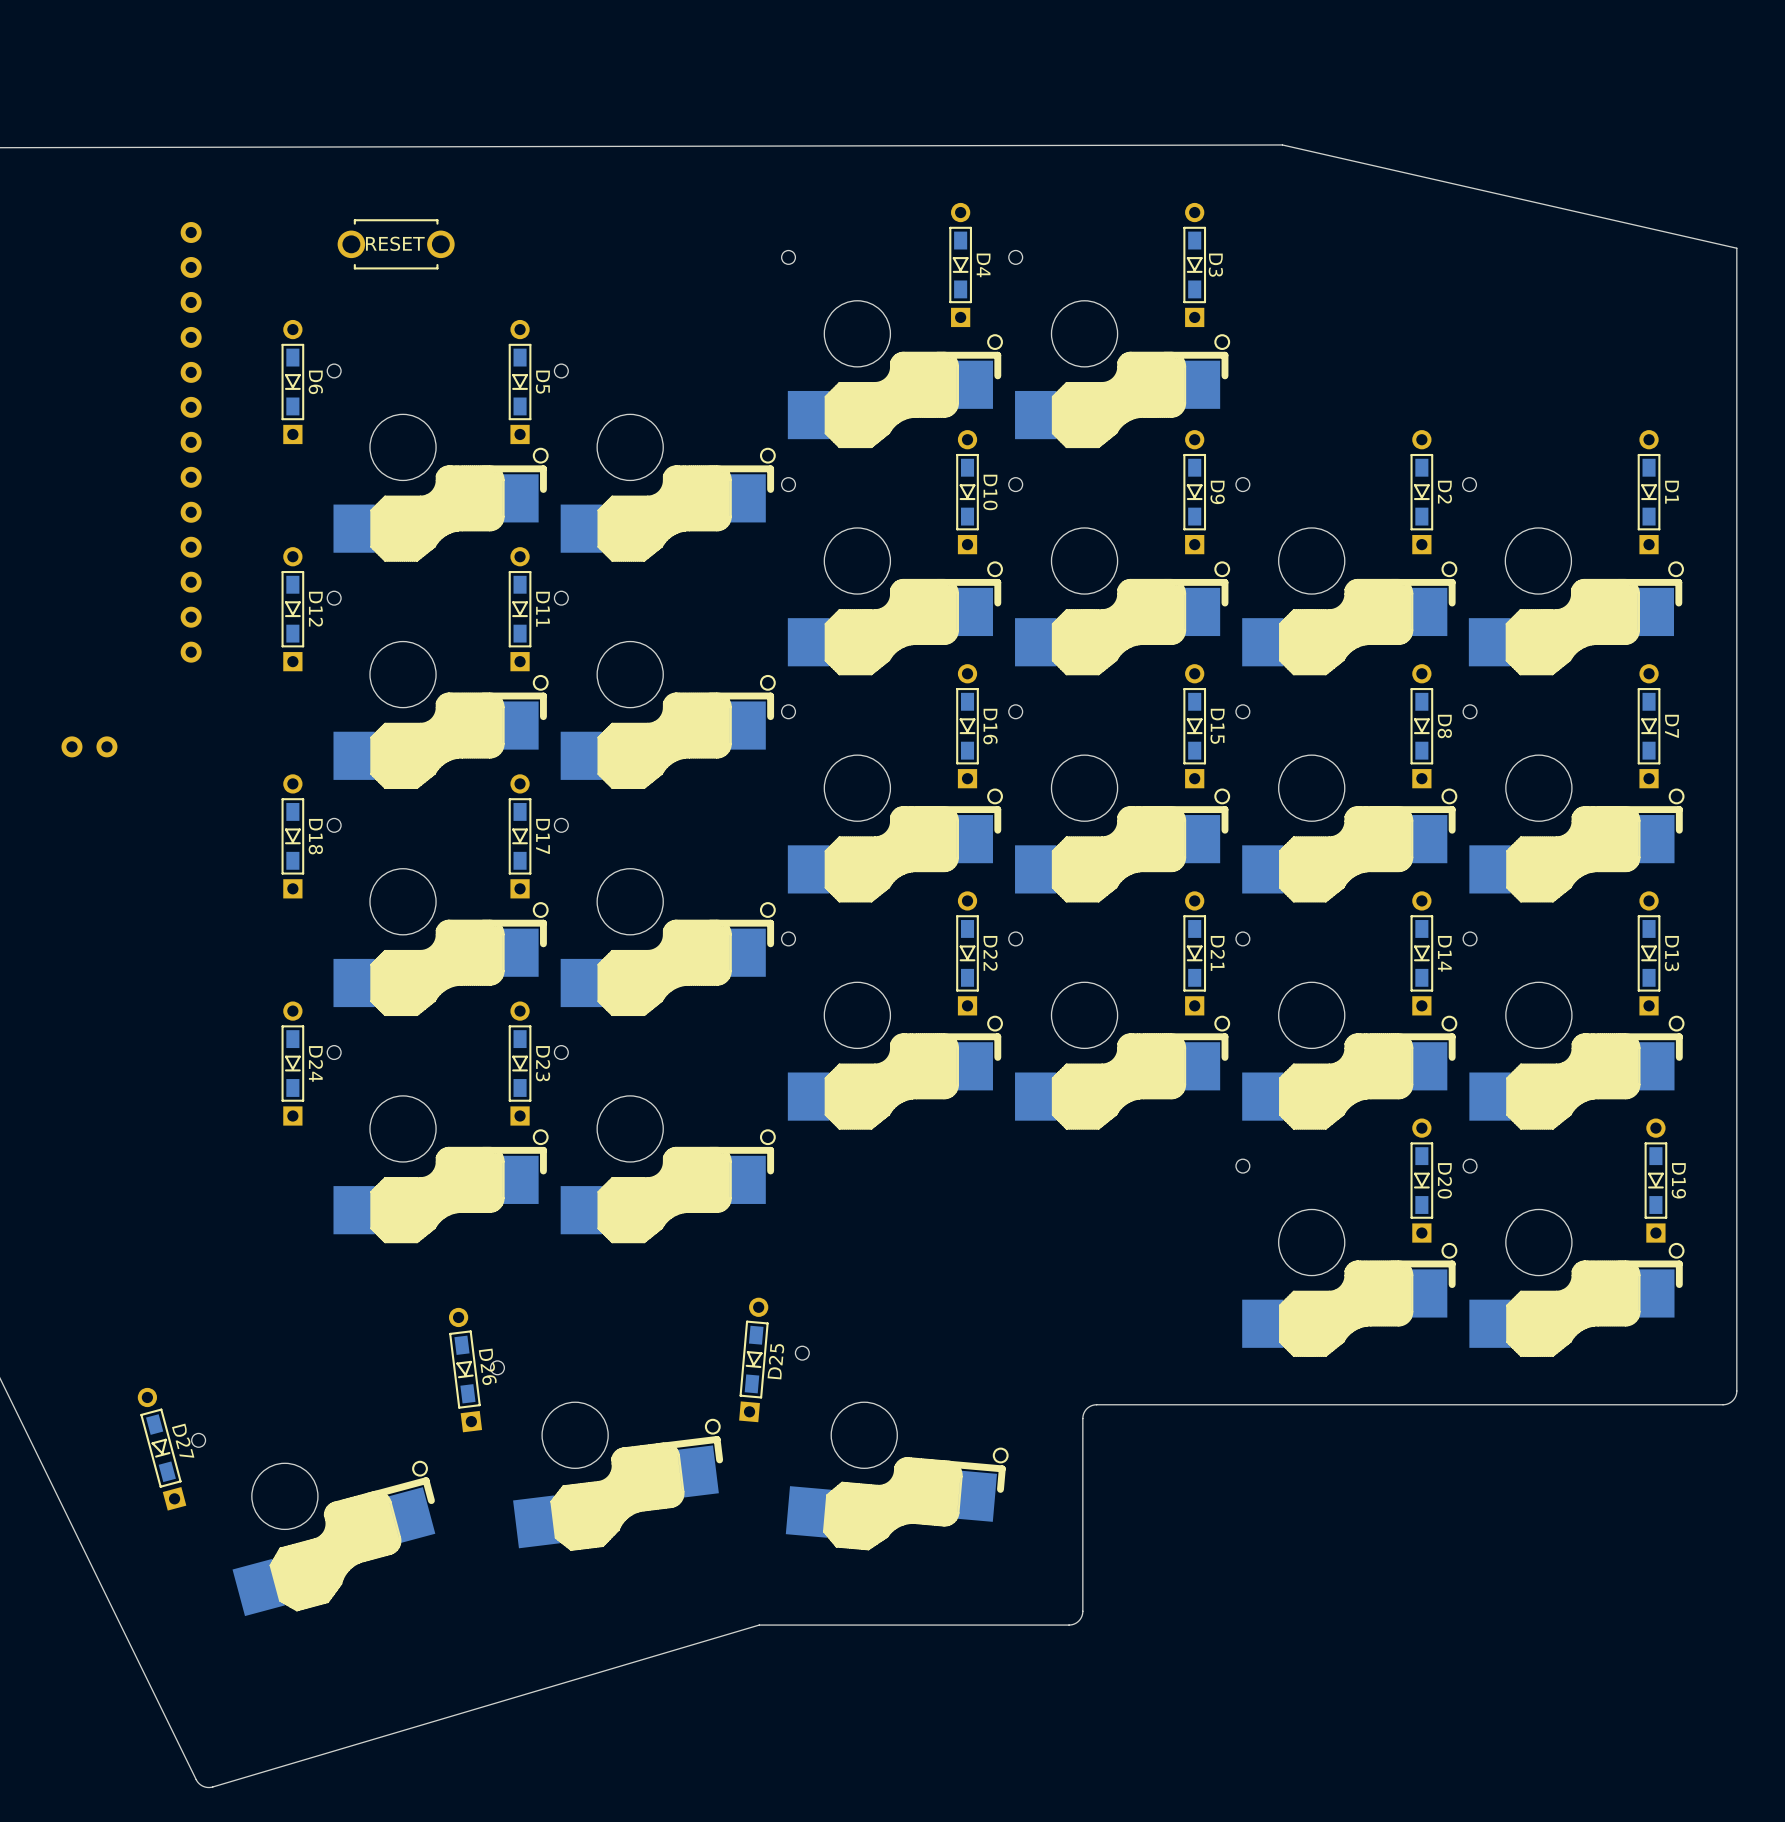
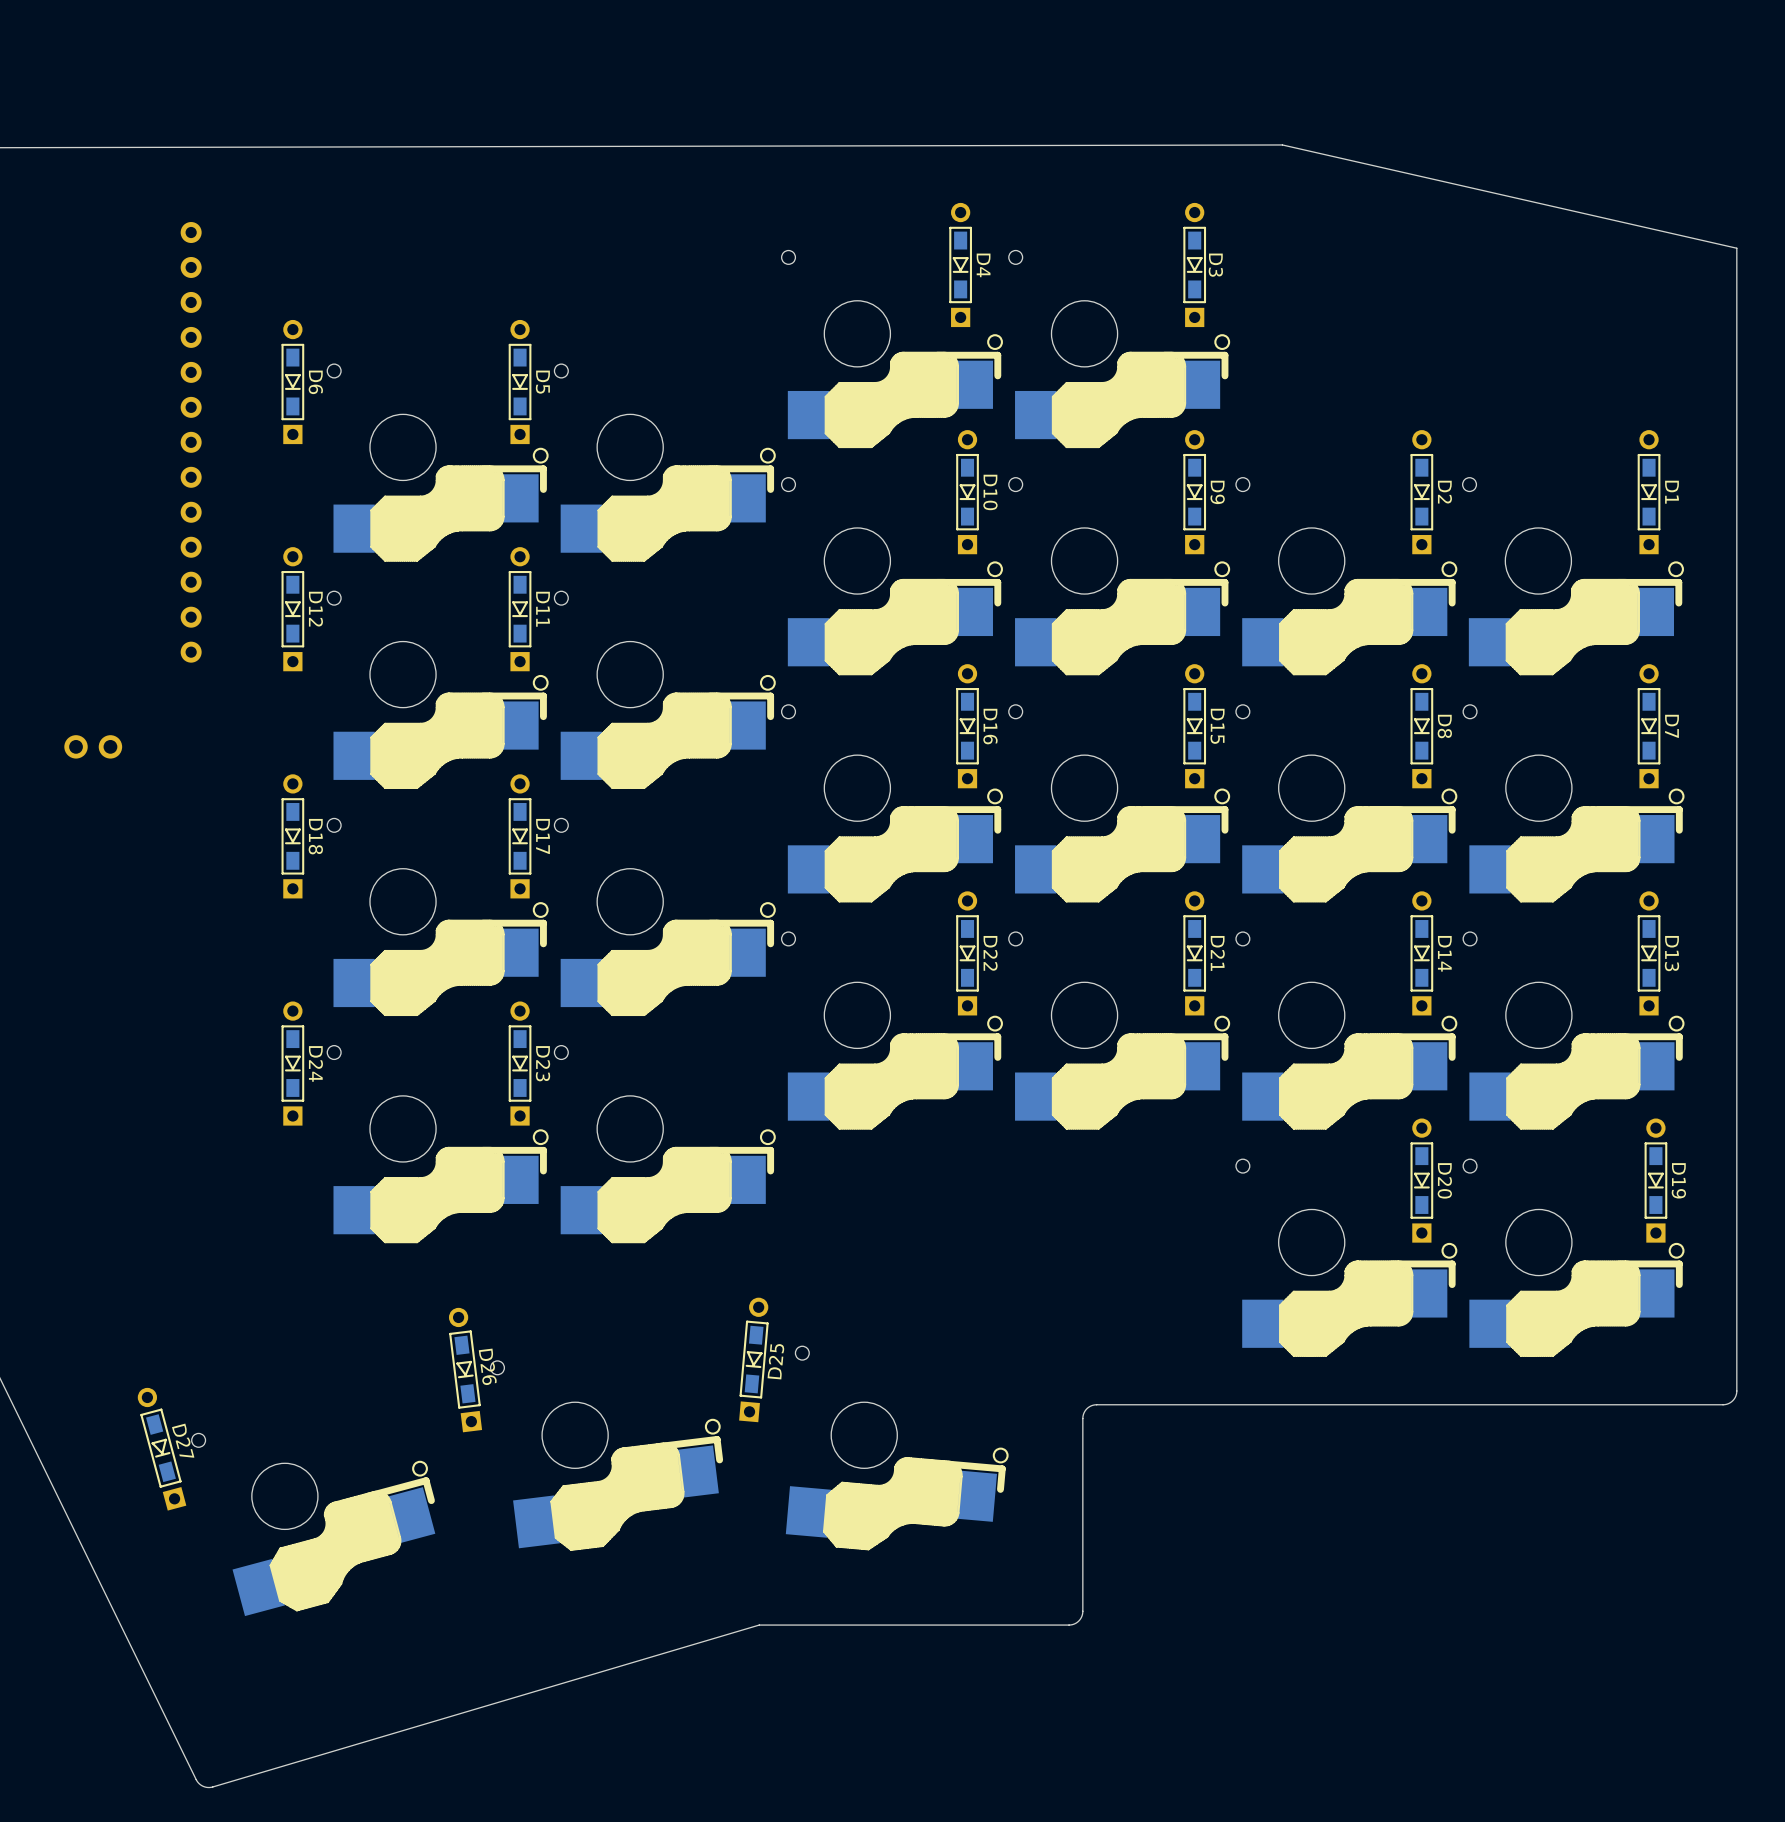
part: (396, 244) -> none
part footprint: [61, 736, 118, 758] -> [64, 735, 123, 759]

